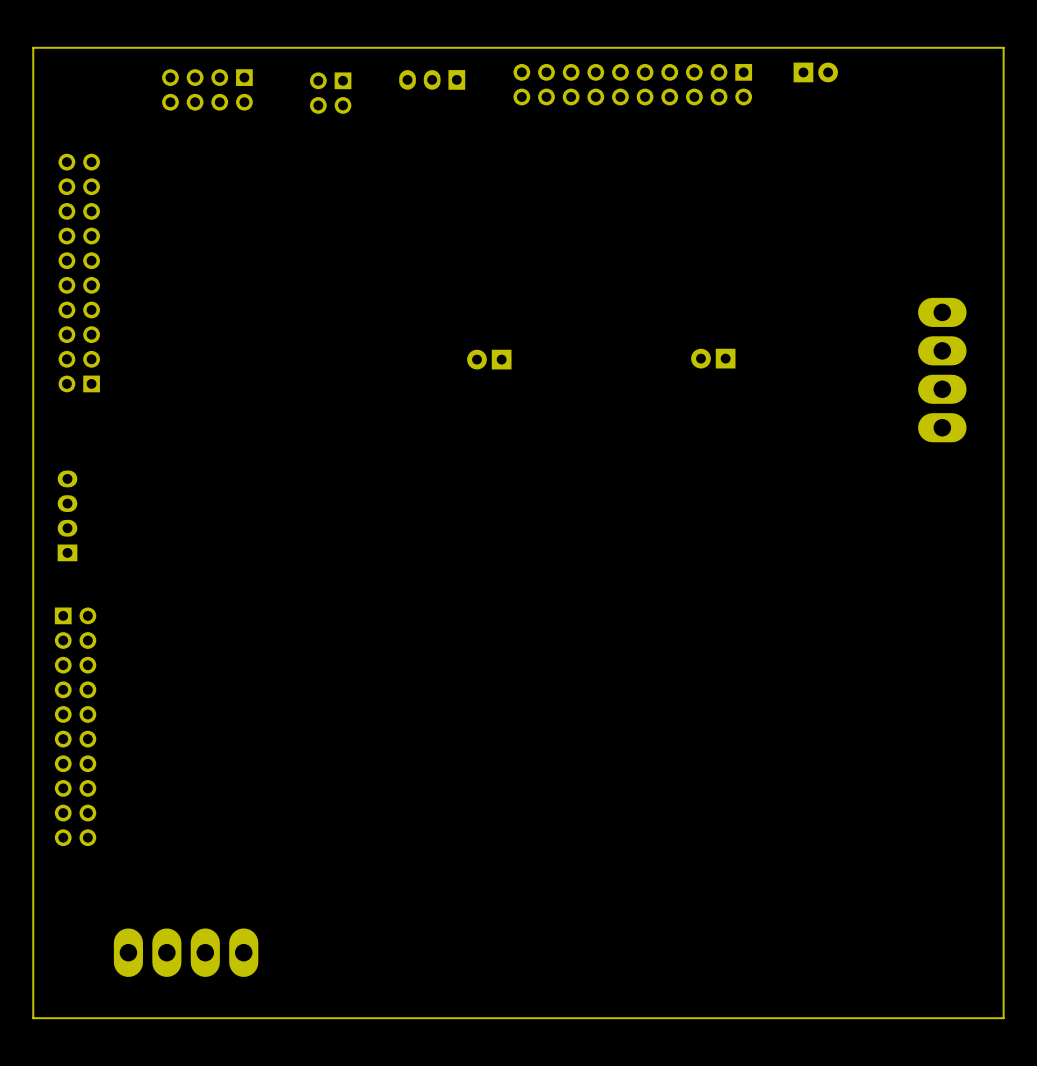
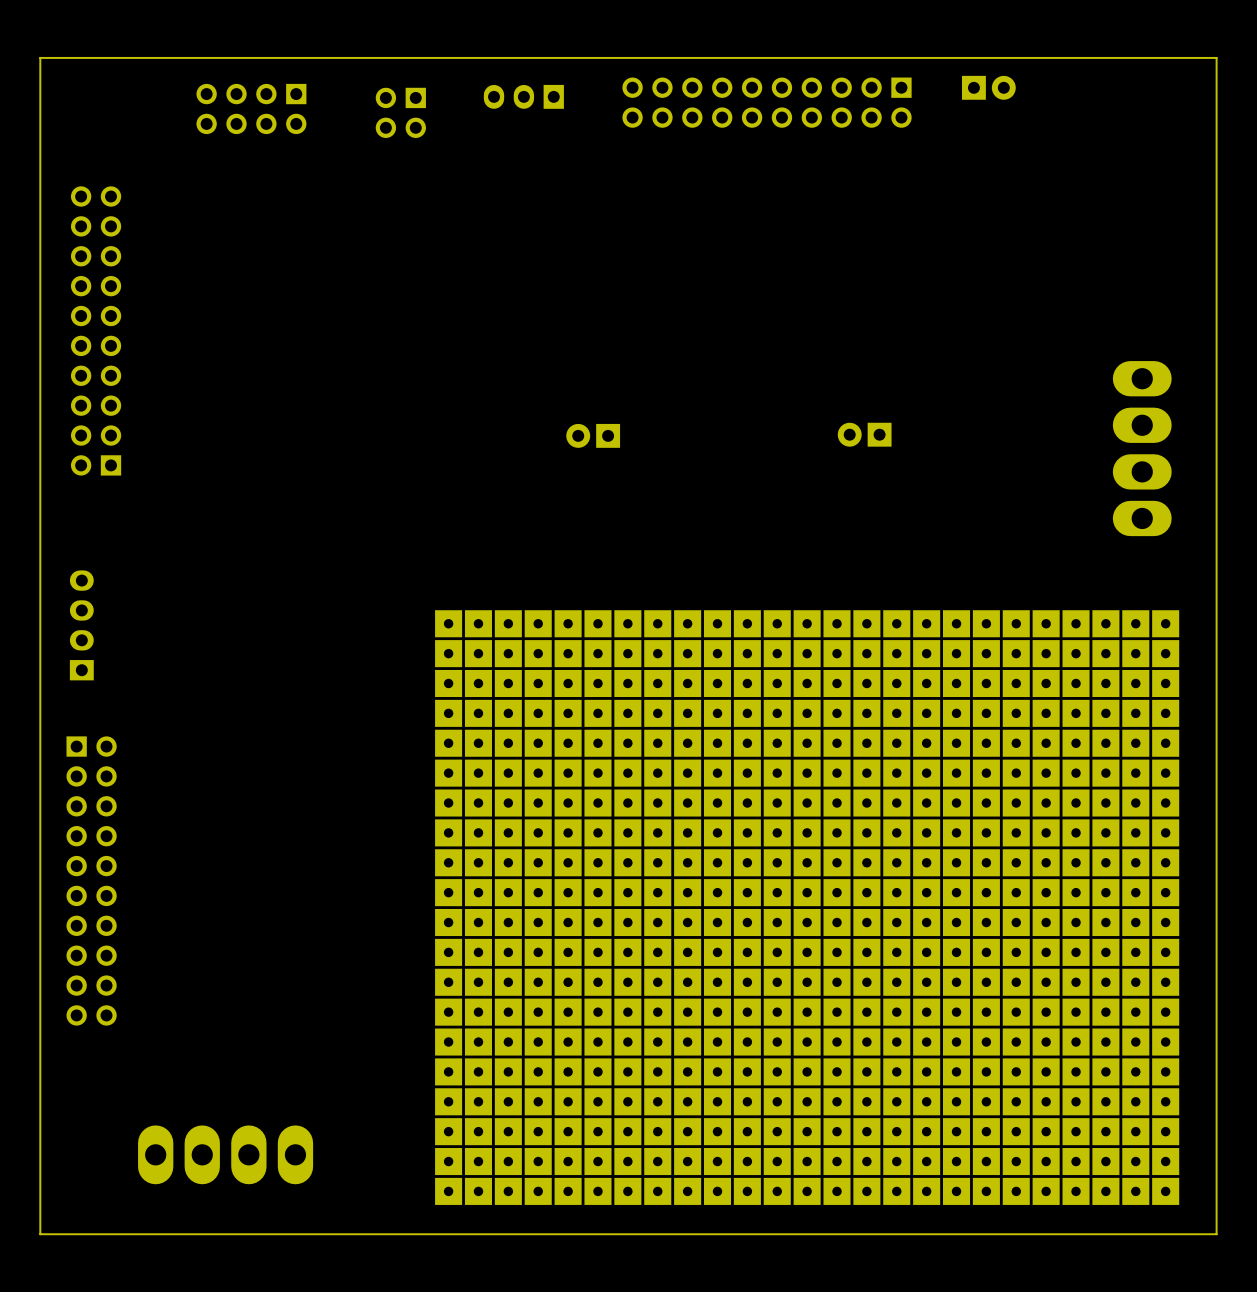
part: none -> (807, 907)

